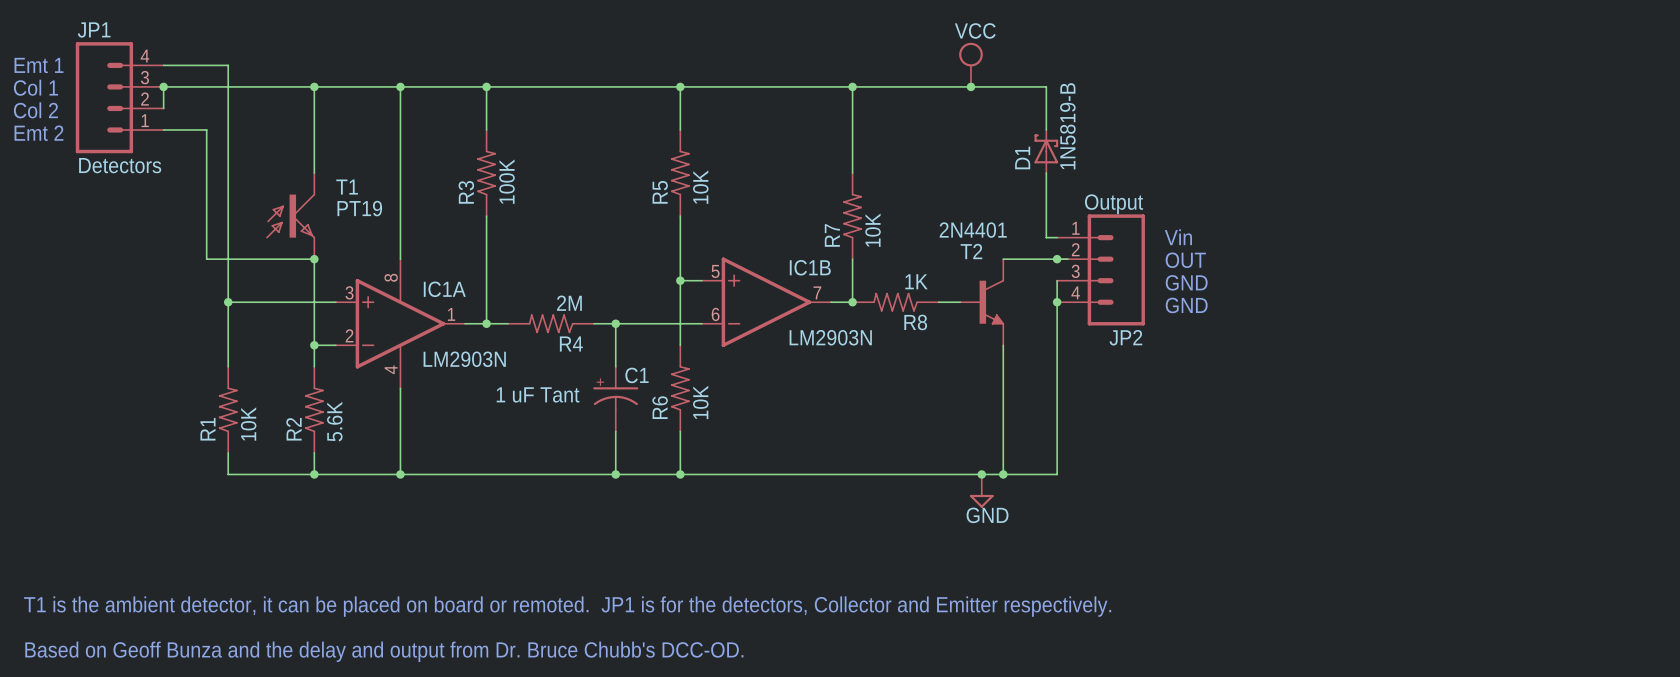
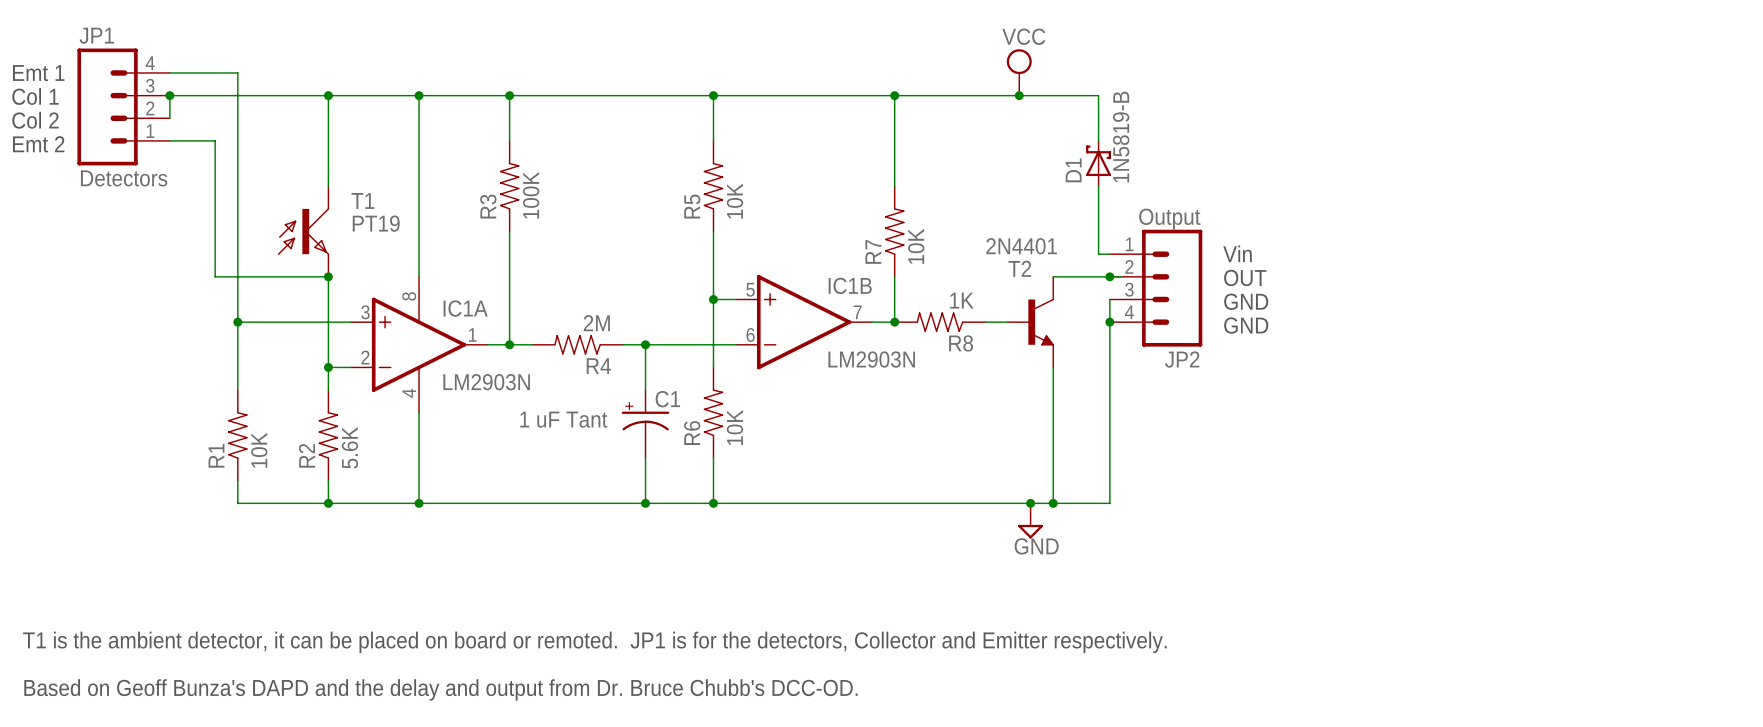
text: Based on Geoff Bunza and the delay and output from Dr. Bruce Chubb's DCC-OD. (384, 651) -> Based on Geoff Bunza's DAPD and the delay and output from Dr. Bruce Chubb's DCC-OD. (440, 689)

